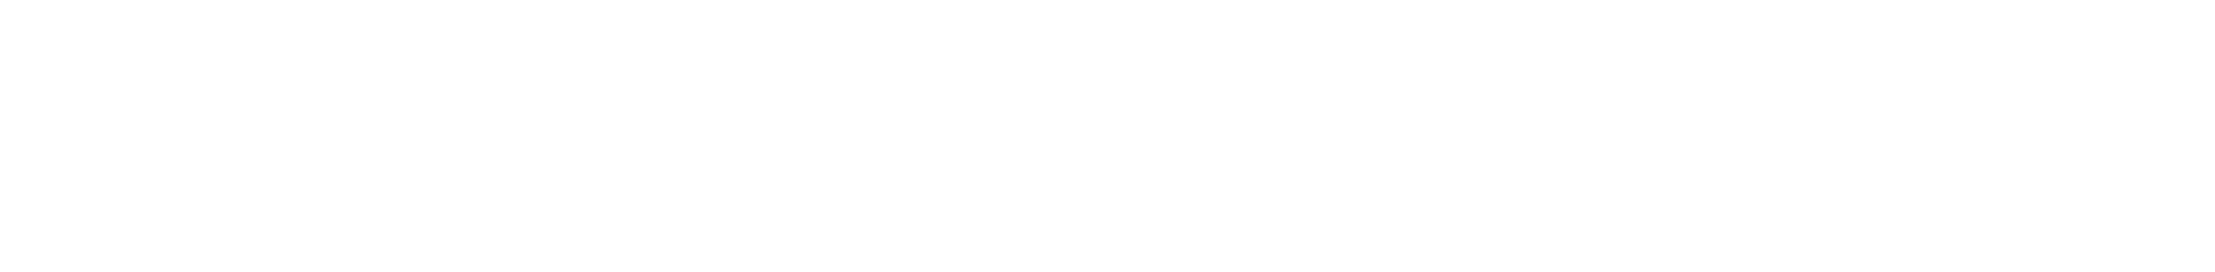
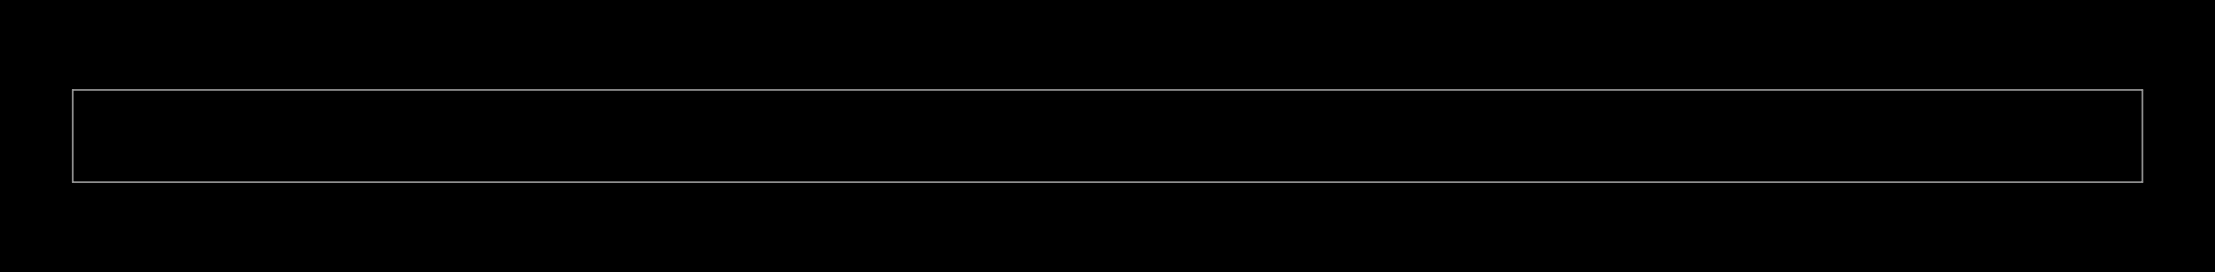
line: none -> (72, 89) (2142, 89) (2142, 182) (72, 182) (72, 89)

